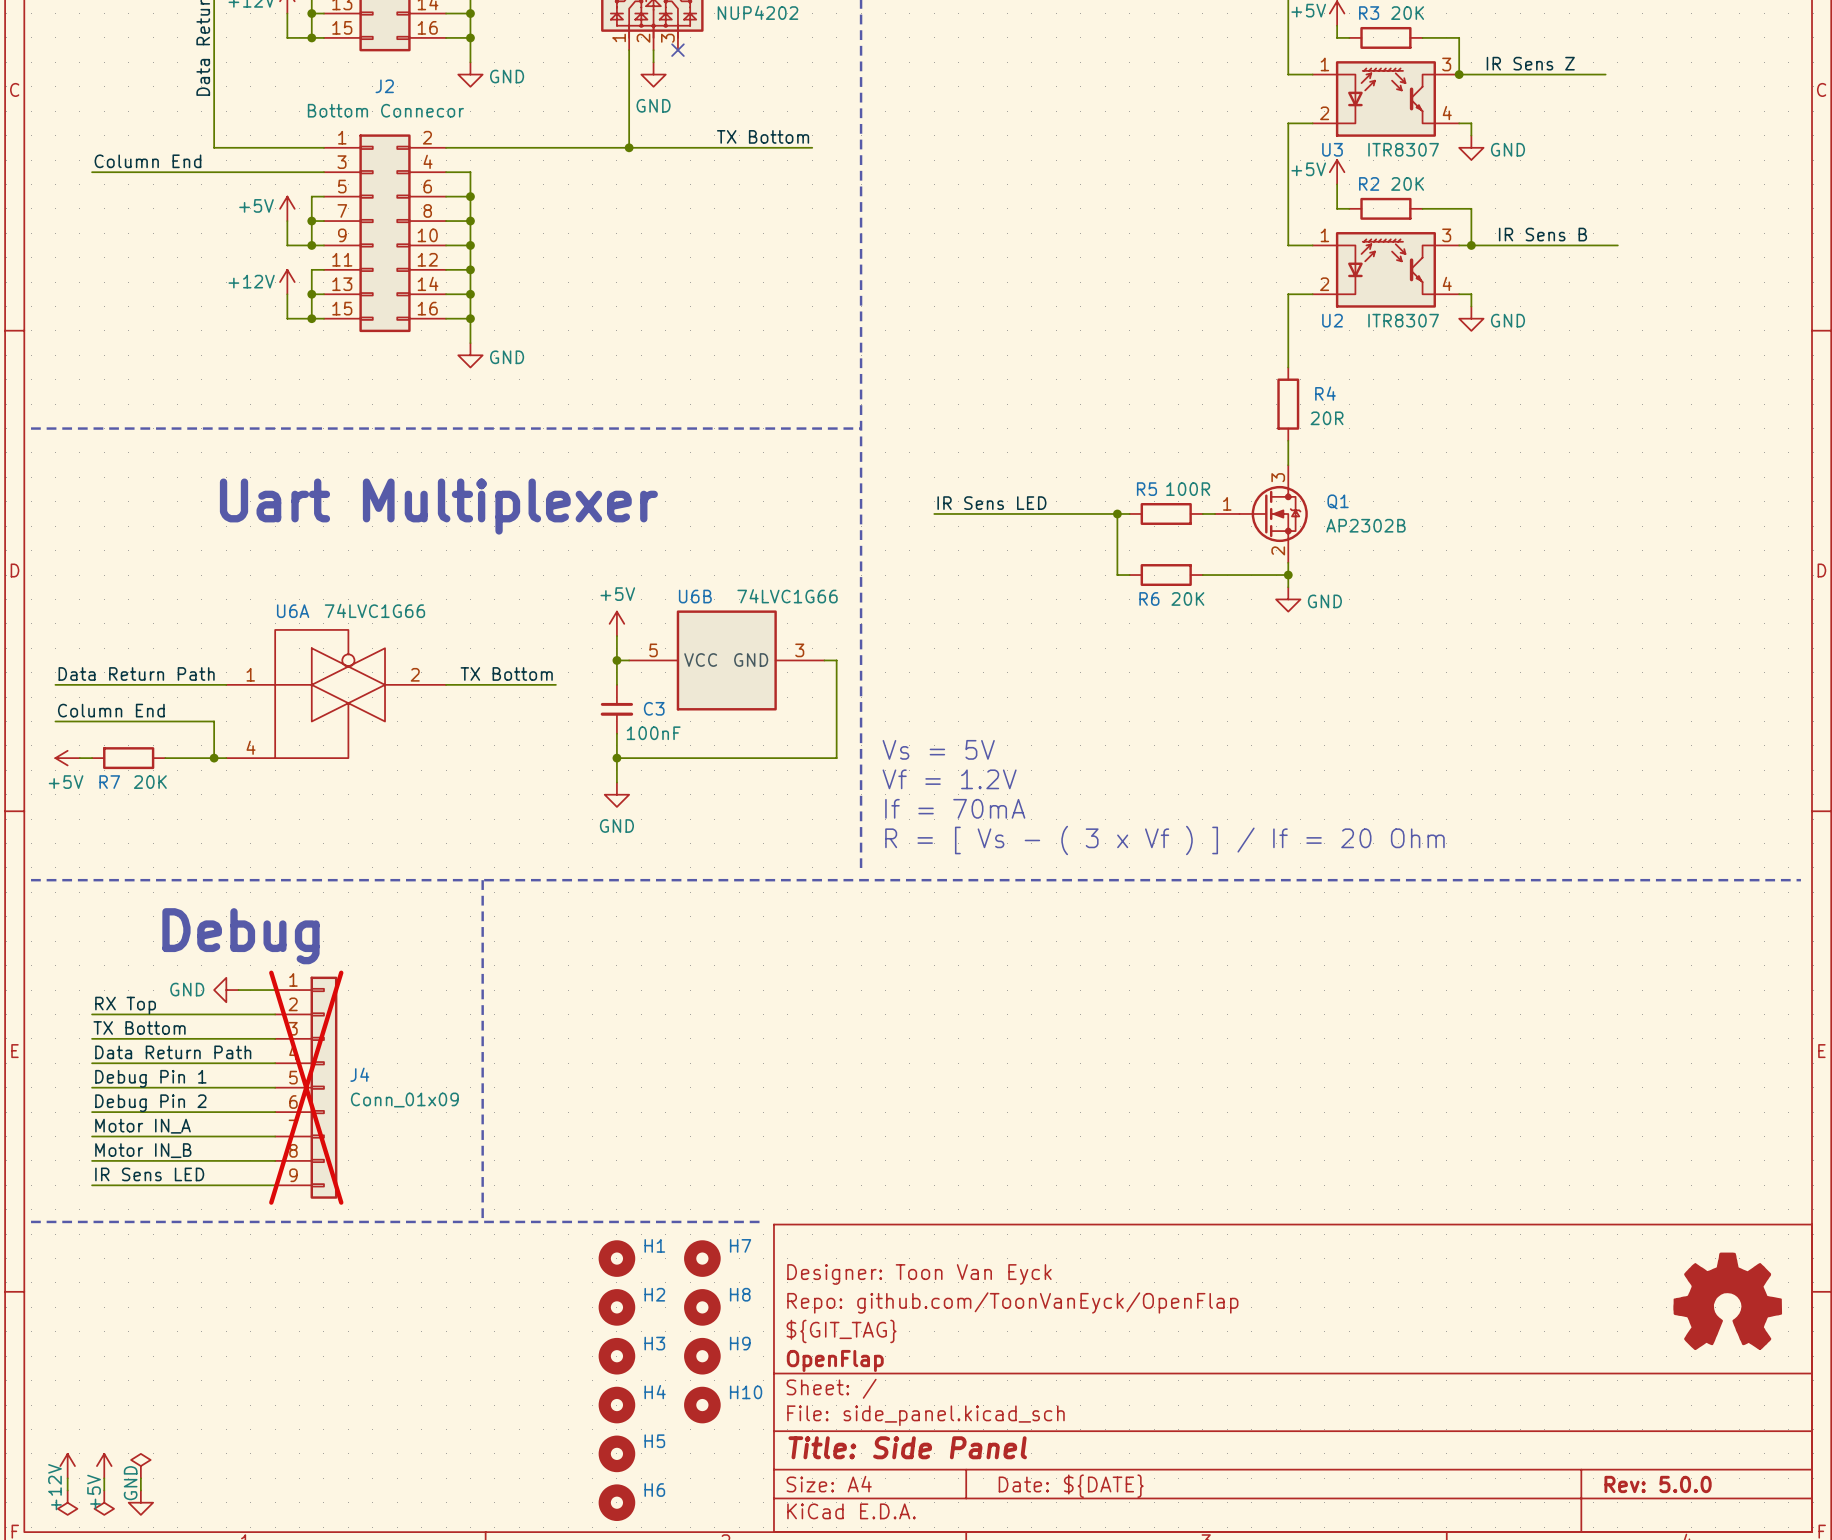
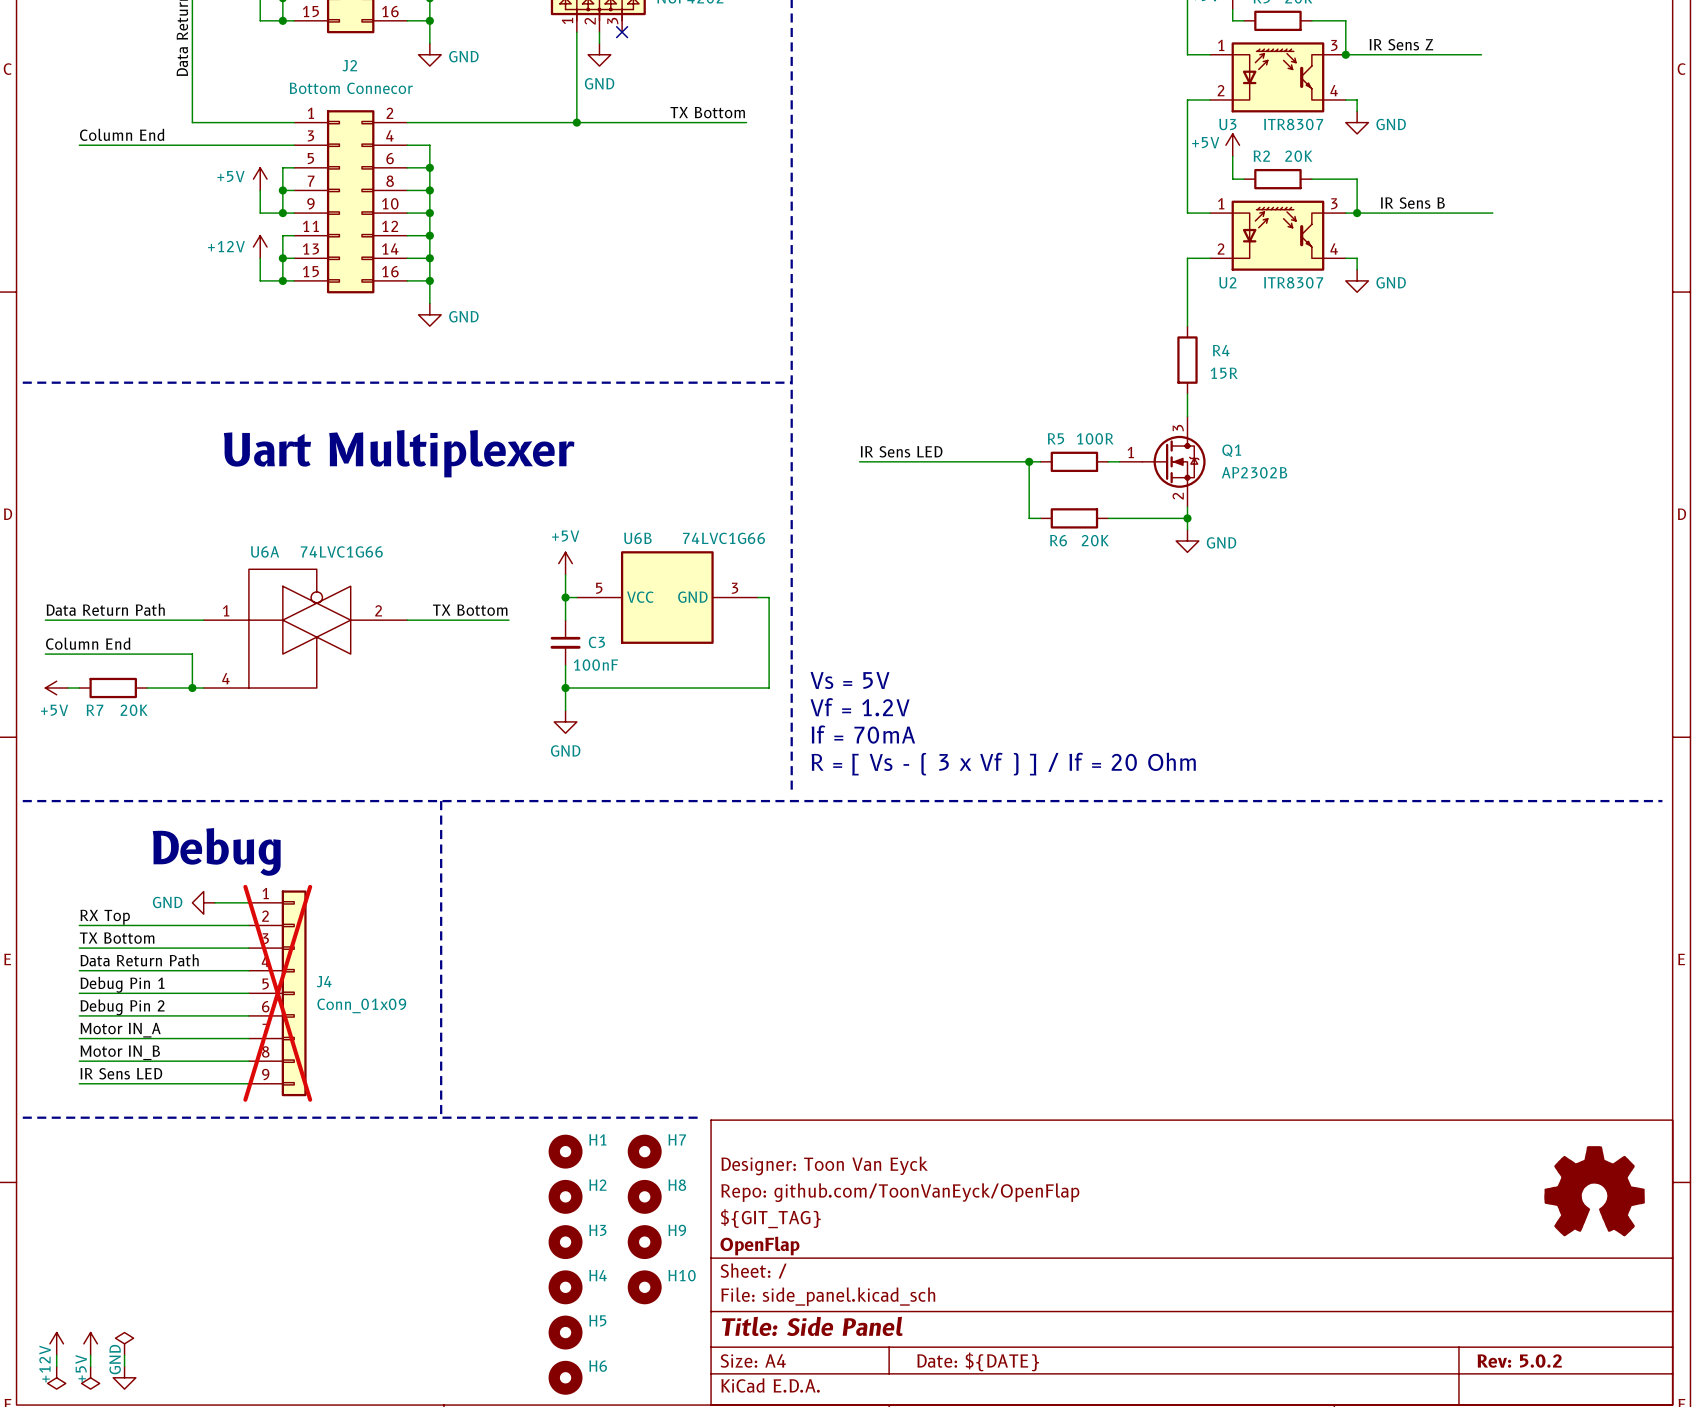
R4 value: 20R (1327, 418) -> 15R (1224, 373)
title block: Rev: 5.0.0 (1658, 1484) -> Rev: 5.0.2 (1519, 1361)

